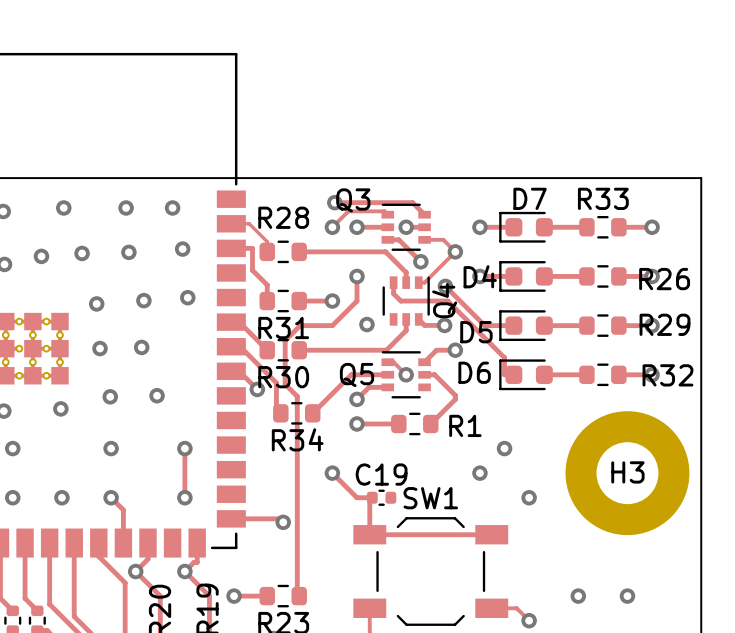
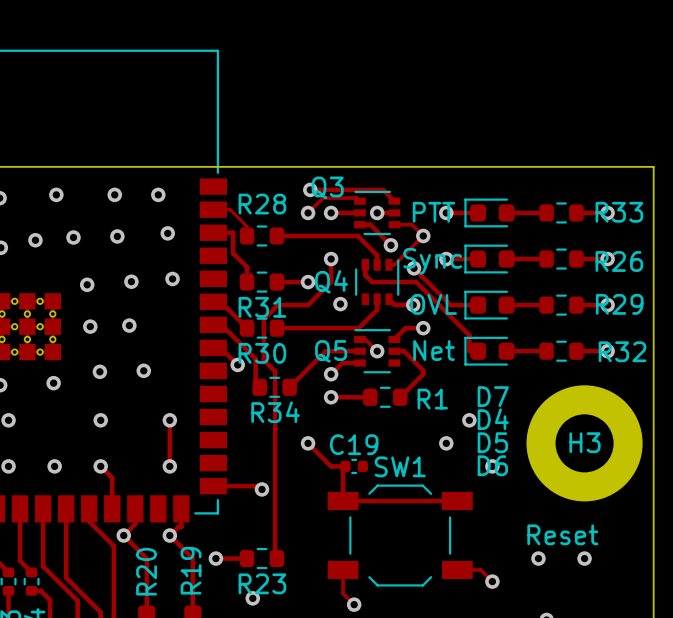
D7 name position: D7 (530, 198) -> D7 (493, 396)
R33 name position: R33 (603, 198) -> R33 (619, 212)
text: none -> PTT (434, 212)
D4 name position: D4 (480, 276) -> D4 (493, 419)
text: none -> Sync (432, 261)
Q4 name rotation: 0° (444, 300) -> 90° clockwise (331, 281)
Q4 name position: Q4 (444, 300) -> Q4 (331, 281)
text: none -> OVL (433, 304)
D5 name position: D5 (476, 332) -> D5 (492, 442)
D6 name position: D6 (474, 372) -> D6 (492, 465)
text: none -> Net (434, 350)
text: none -> Reset (562, 534)

